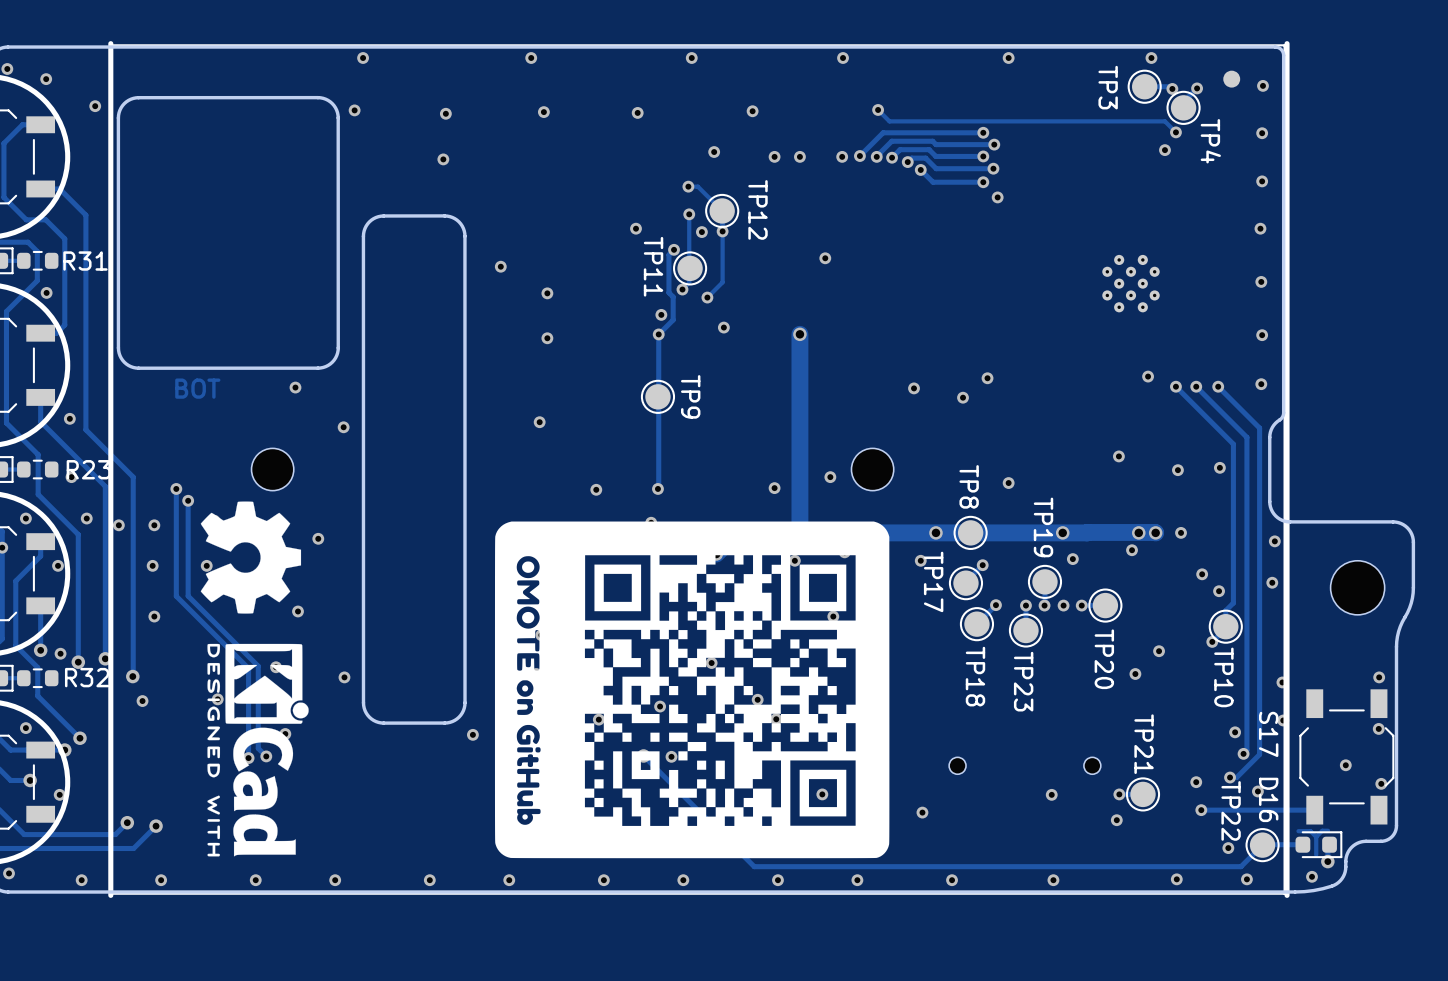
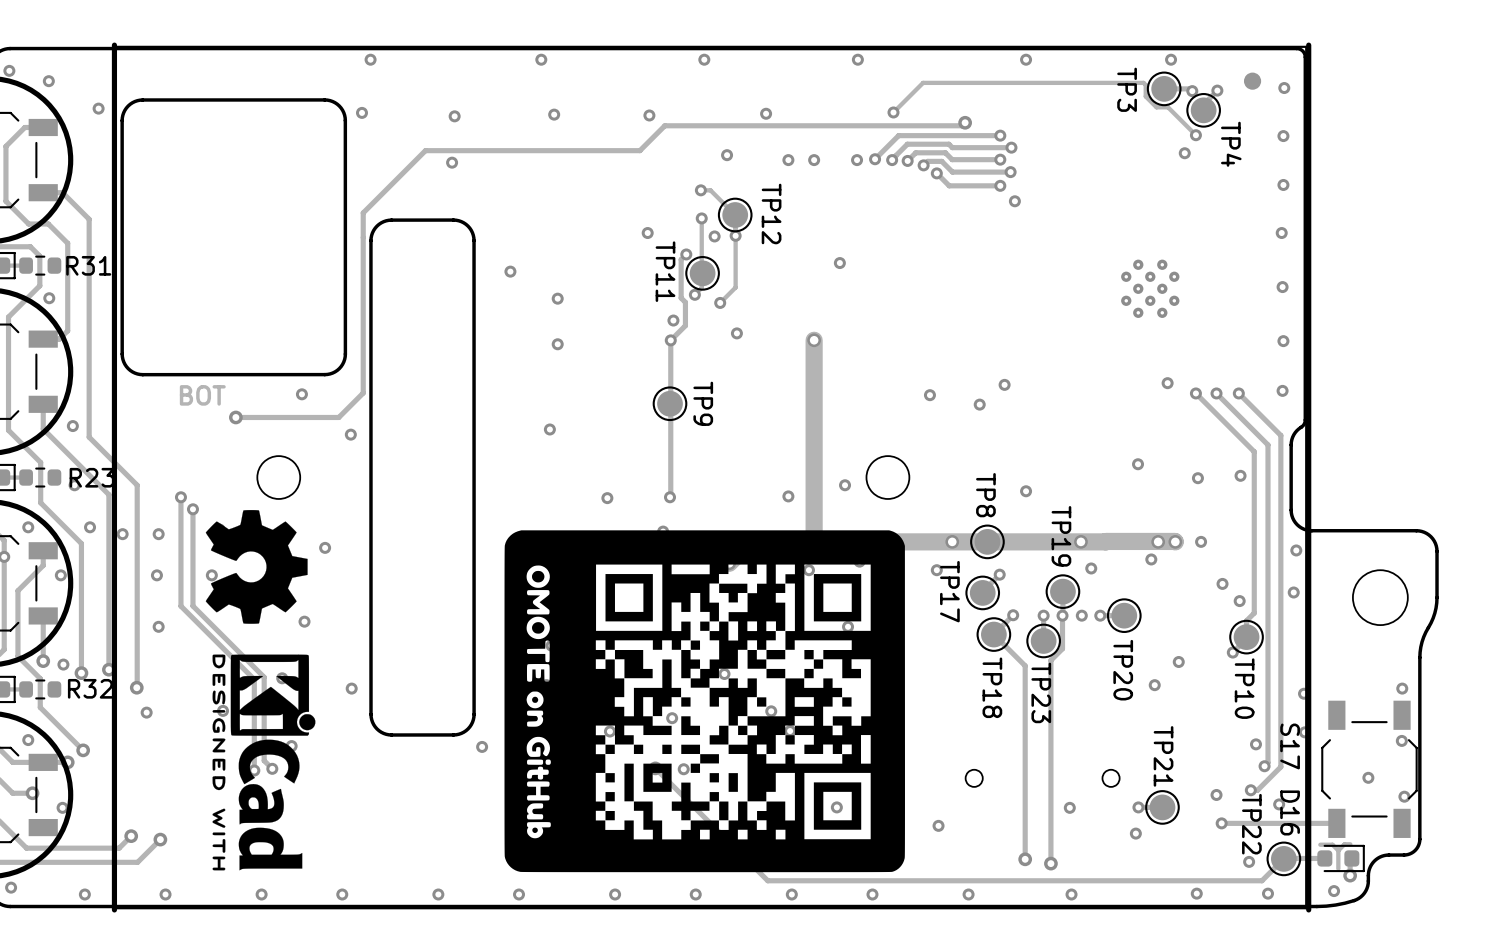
track: (878, 109) (889, 121) (1164, 121) -> (893, 112) (923, 82) (1143, 82) (1145, 85) (1145, 96) (1156, 107) (1168, 107) (1184, 124)
track: none -> (965, 122) (962, 125) (664, 125) (639, 150) (425, 150) (363, 212) (363, 393) (338, 417) (235, 417)
via: none -> (965, 122)
via: none -> (235, 417)
track: none -> (1062, 615) (1062, 648) (1050, 660) (1050, 863)
track: none -> (993, 634) (1025, 665) (1025, 859)
via: none -> (1025, 859)
via: none -> (1050, 863)

